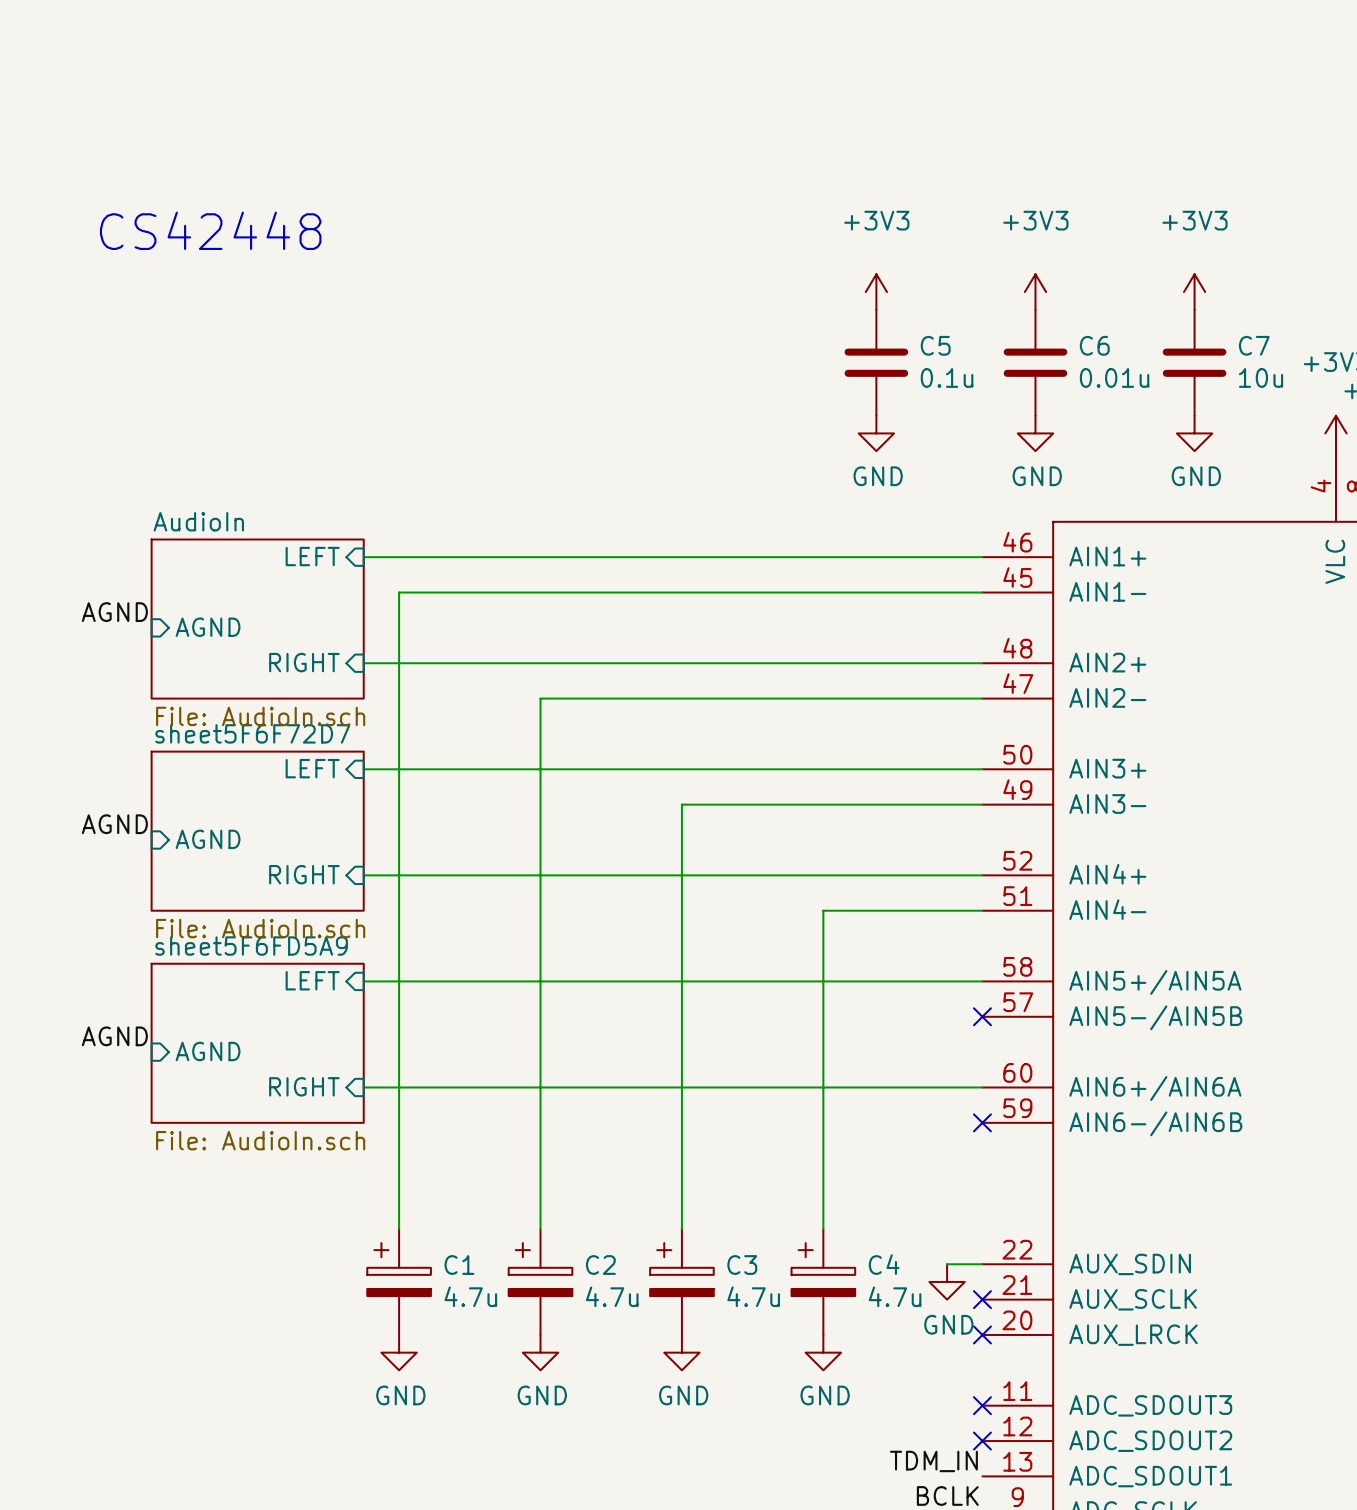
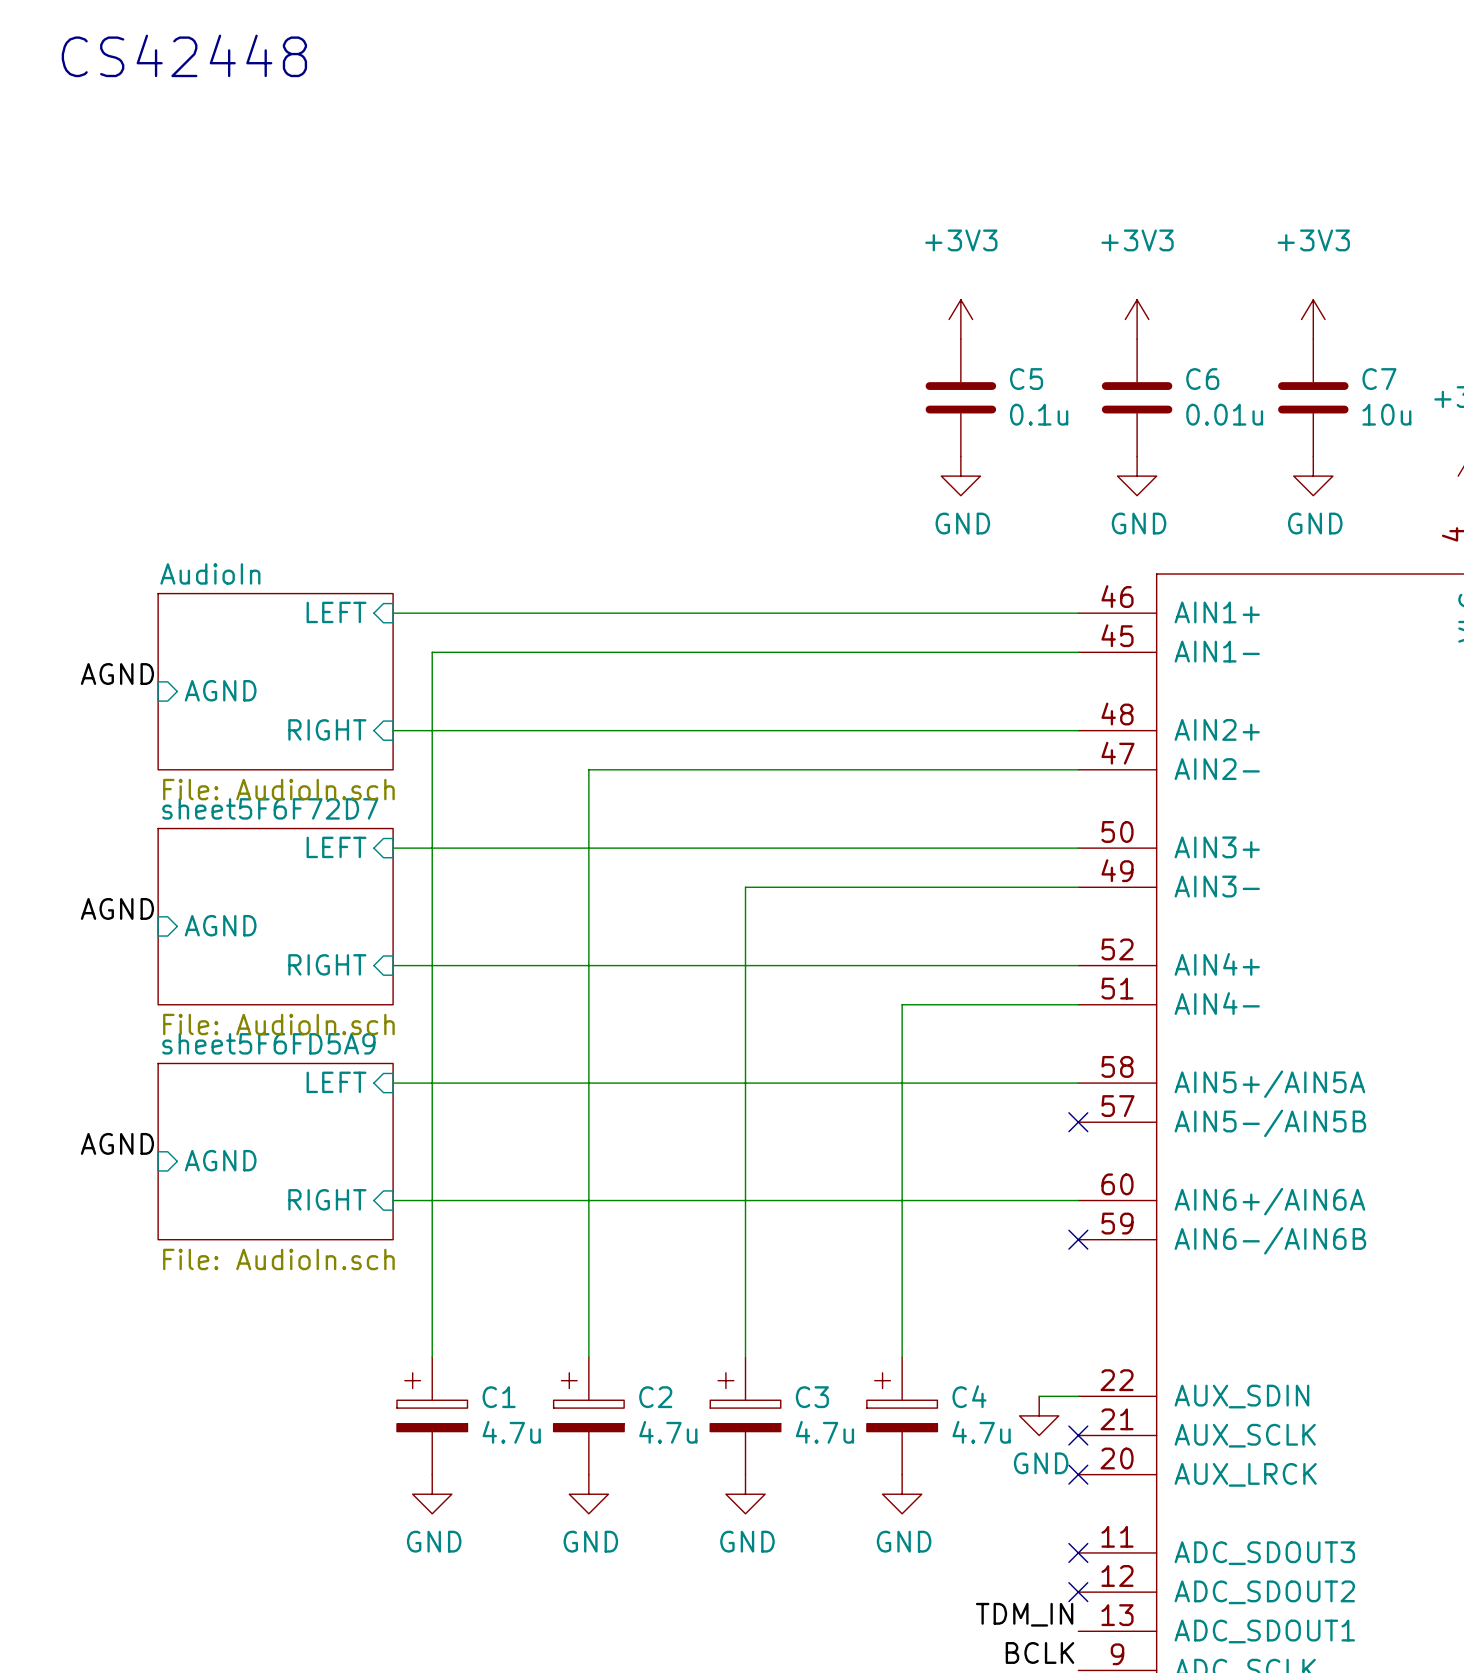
text position: CS42448 (210, 230) -> CS42448 (184, 55)

